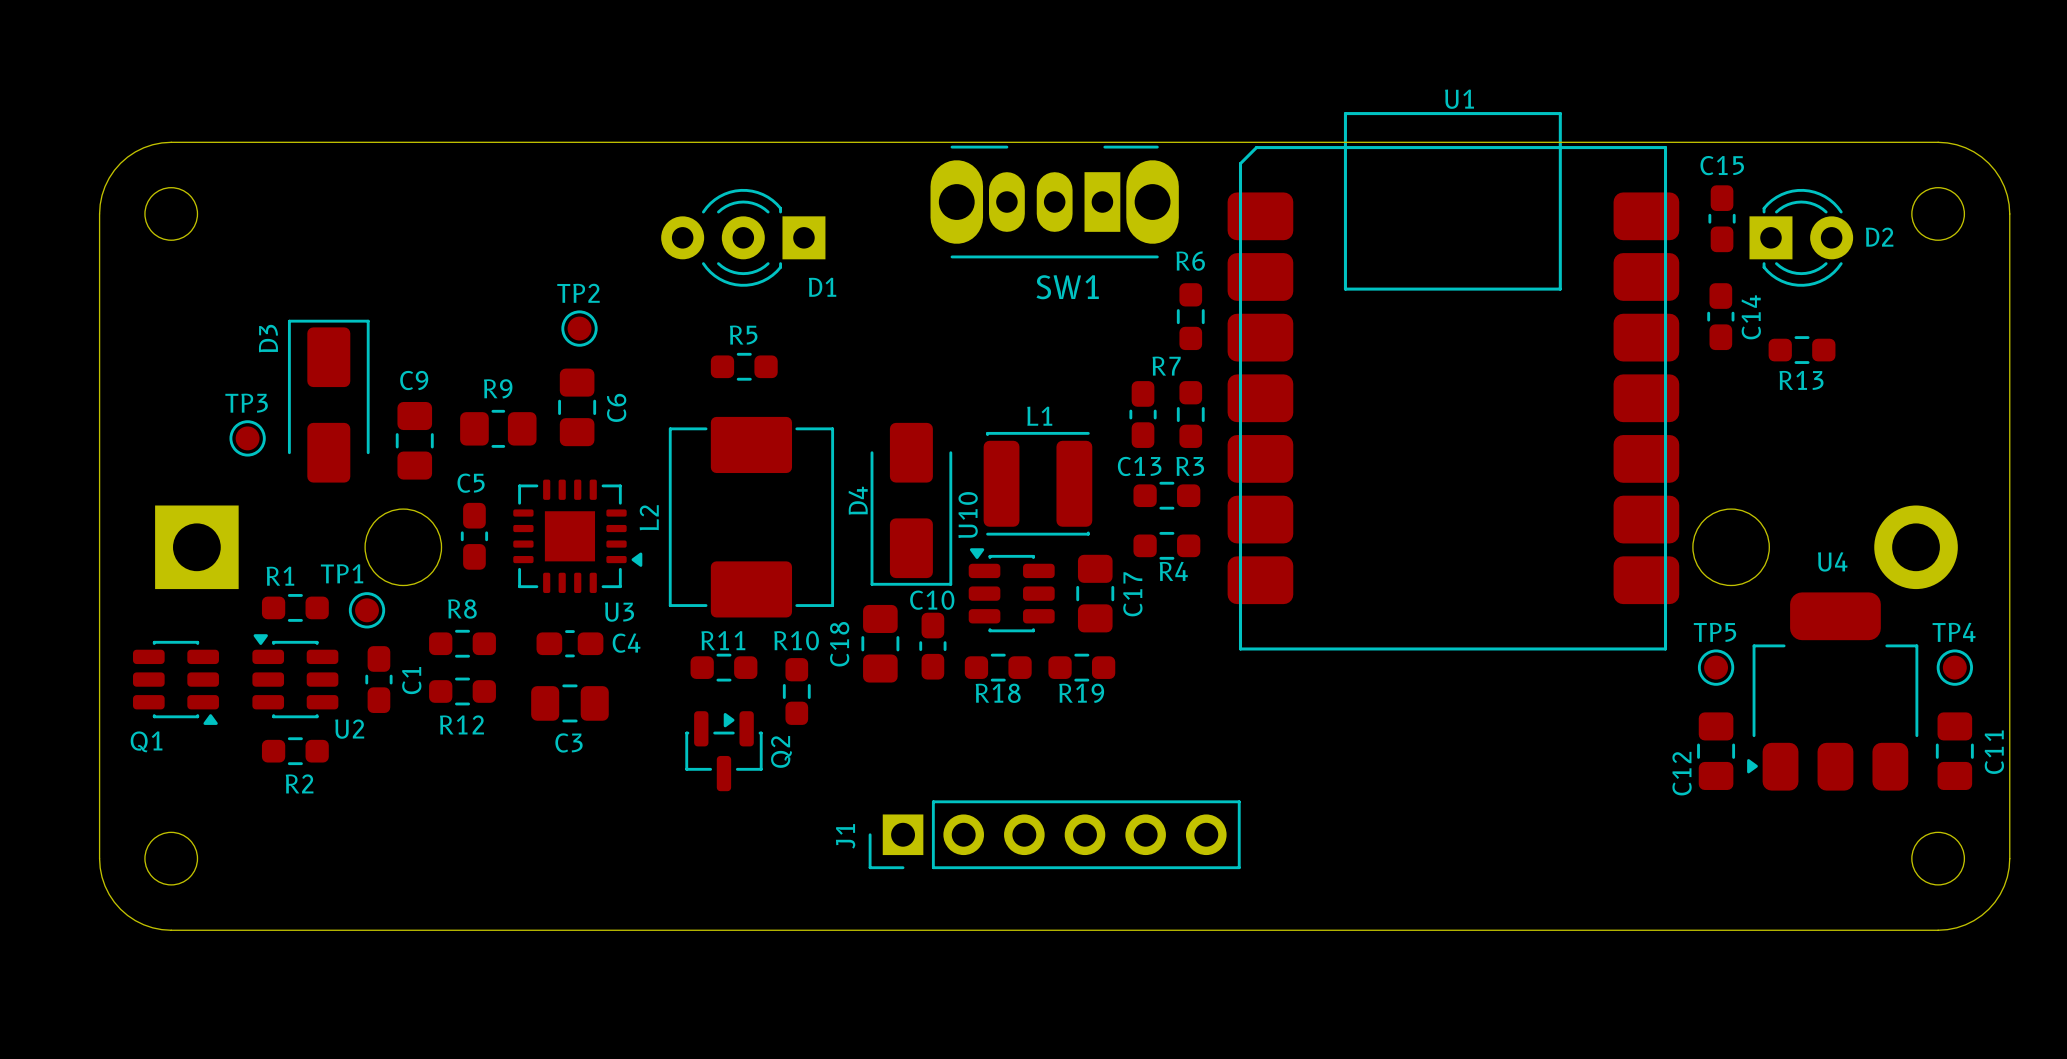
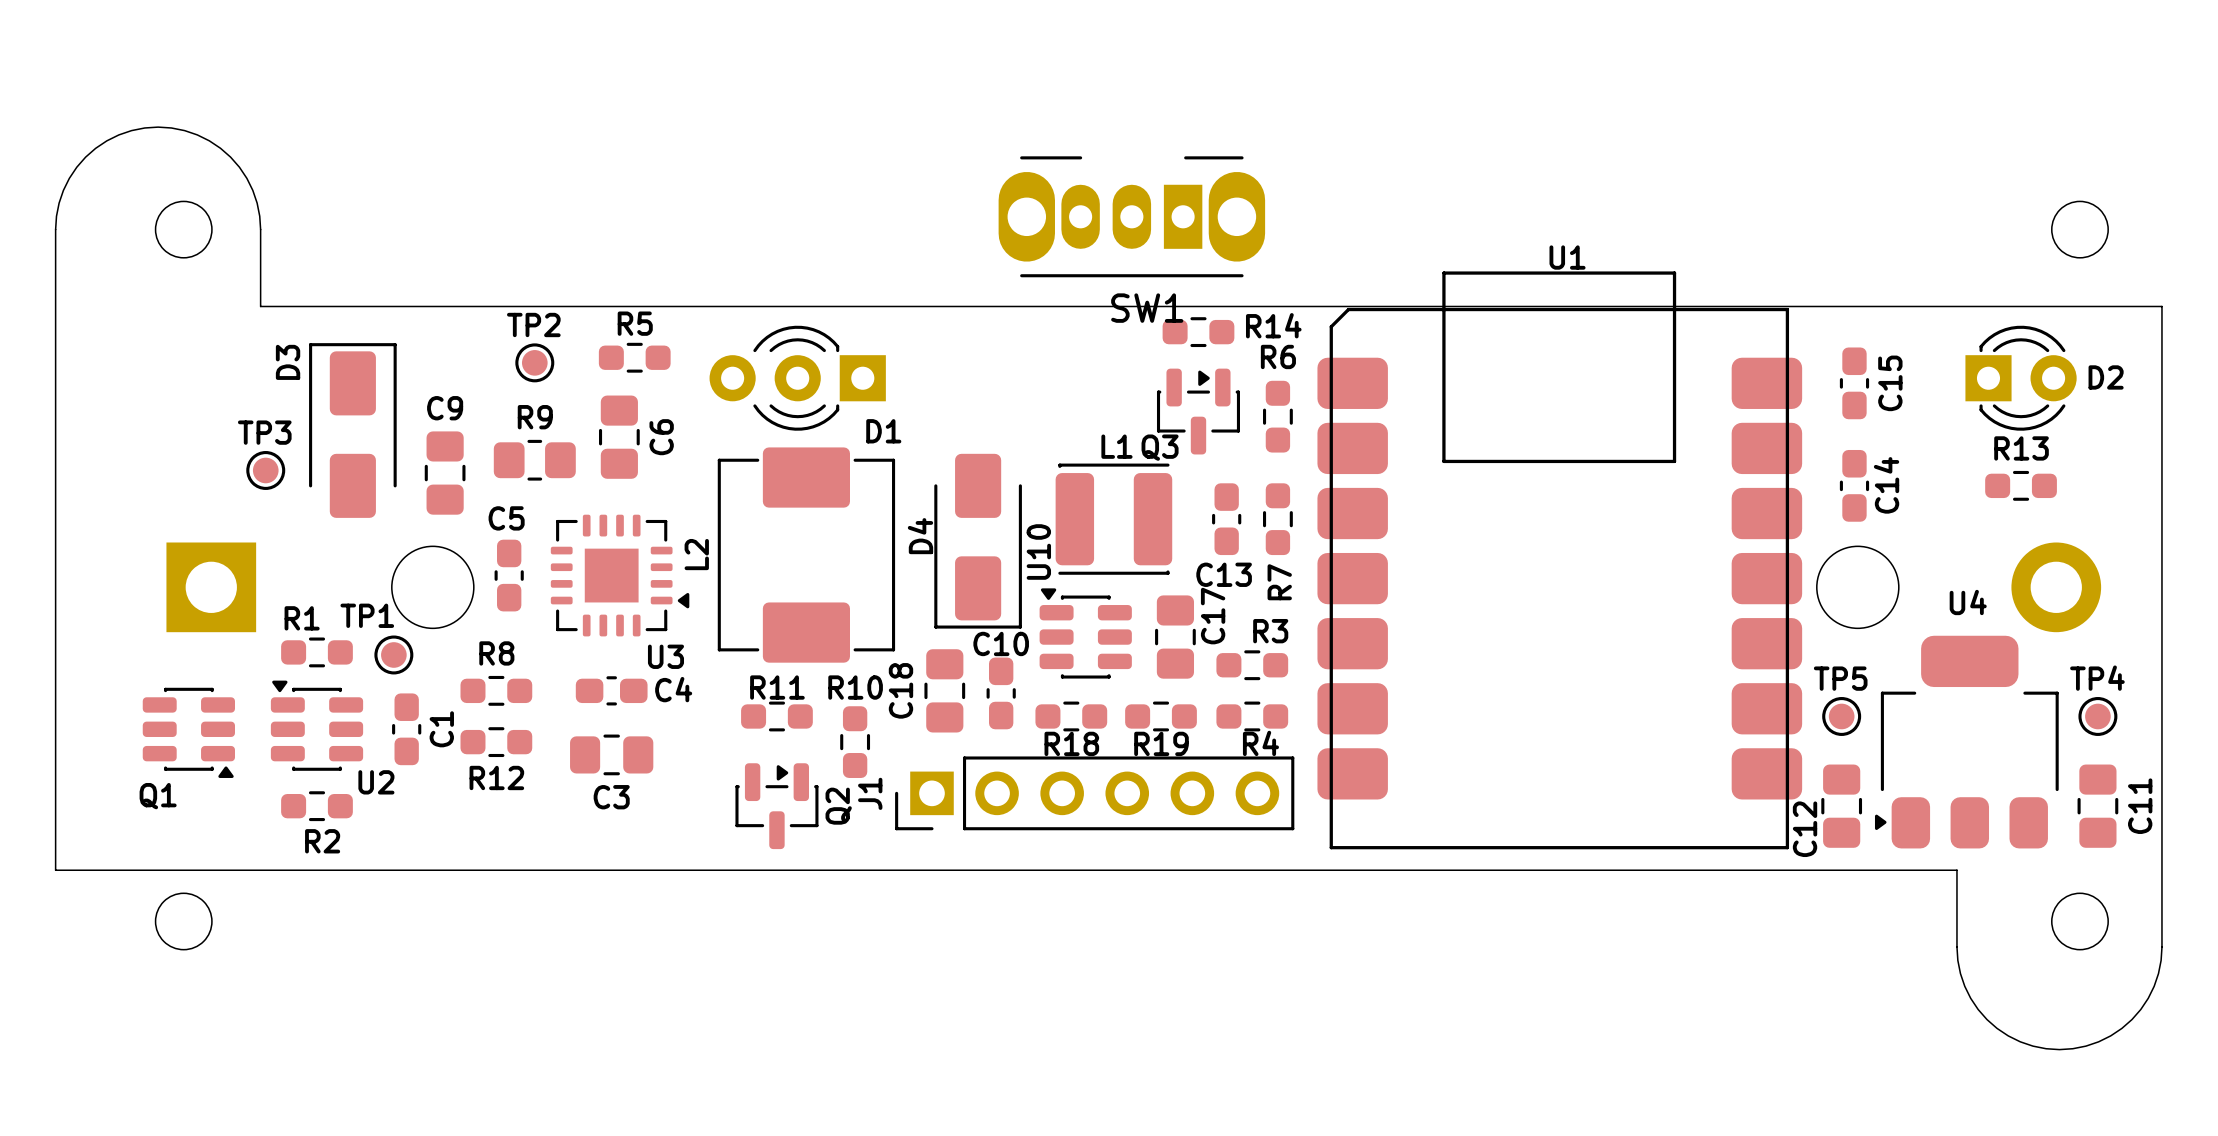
board edge: (171, 142) (1938, 142) (1965, 147) (1981, 157) (1994, 170) (2007, 195) (2009, 213) (2009, 858) (2004, 886) (1994, 902) (1981, 915) (1956, 927) (1938, 930) (171, 930) (143, 924) (127, 915) (114, 902) (102, 877) (99, 858) (99, 213) (105, 186) (120, 163) (143, 147) (171, 142) -> (55, 229) (55, 870) (1956, 870) (1956, 947) (1960, 973) (1970, 998) (1978, 1009) (1997, 1028) (2008, 1035) (2032, 1046) (2046, 1048) (2072, 1048) (2086, 1046) (2098, 1041) (2121, 1028) (2140, 1009) (2154, 986) (2158, 973) (2161, 947) (2161, 306) (260, 306) (259, 216) (252, 190) (246, 178) (230, 157) (209, 140) (184, 130) (158, 127) (144, 127) (118, 134) (106, 140) (85, 157) (76, 167) (63, 190) (56, 216) (55, 229)
C15 name rotation: 0° (1722, 165) -> 90° counterclockwise (1890, 383)
C15 position: (1722, 218) -> (1854, 383)
D1 position: (743, 237) -> (797, 378)
D2 position: (1801, 237) -> (2021, 378)
R14: none -> (1198, 332)
R6 position: (1190, 316) -> (1277, 416)
C14 position: (1720, 316) -> (1854, 485)
TP2 position: (579, 328) -> (534, 362)
R13 position: (1802, 350) -> (2021, 485)
R5 position: (744, 366) -> (634, 357)
R7 name rotation: 0° (1166, 366) -> 90° counterclockwise (1279, 582)
R7 name position: R7 (1166, 366) -> R7 (1279, 582)
R13 name position: R13 (1801, 380) -> R13 (2021, 448)
U1 position: (1453, 381) -> (1559, 560)
Q3: none -> (1198, 411)
C13 position: (1143, 414) -> (1226, 519)
R7 position: (1190, 414) -> (1277, 519)
R3 name position: R3 (1190, 466) -> R3 (1270, 631)
R3 position: (1166, 495) -> (1252, 665)
R4 position: (1166, 545) -> (1252, 716)
C17 name position: C17 (1132, 594) -> C17 (1213, 616)
J1 position: (1054, 834) -> (1094, 793)

